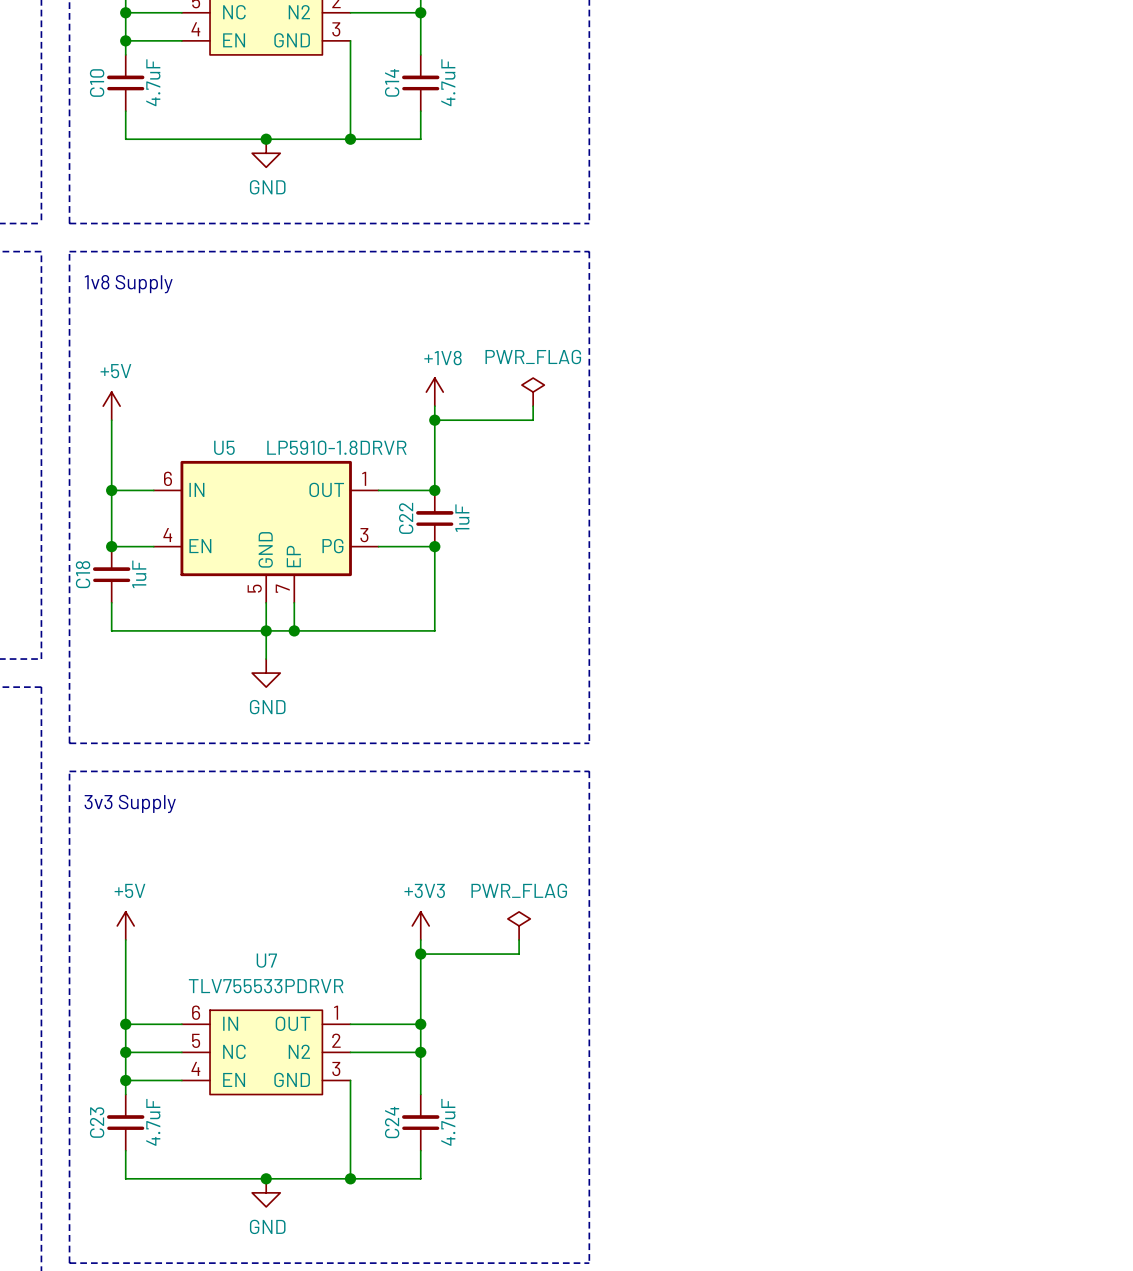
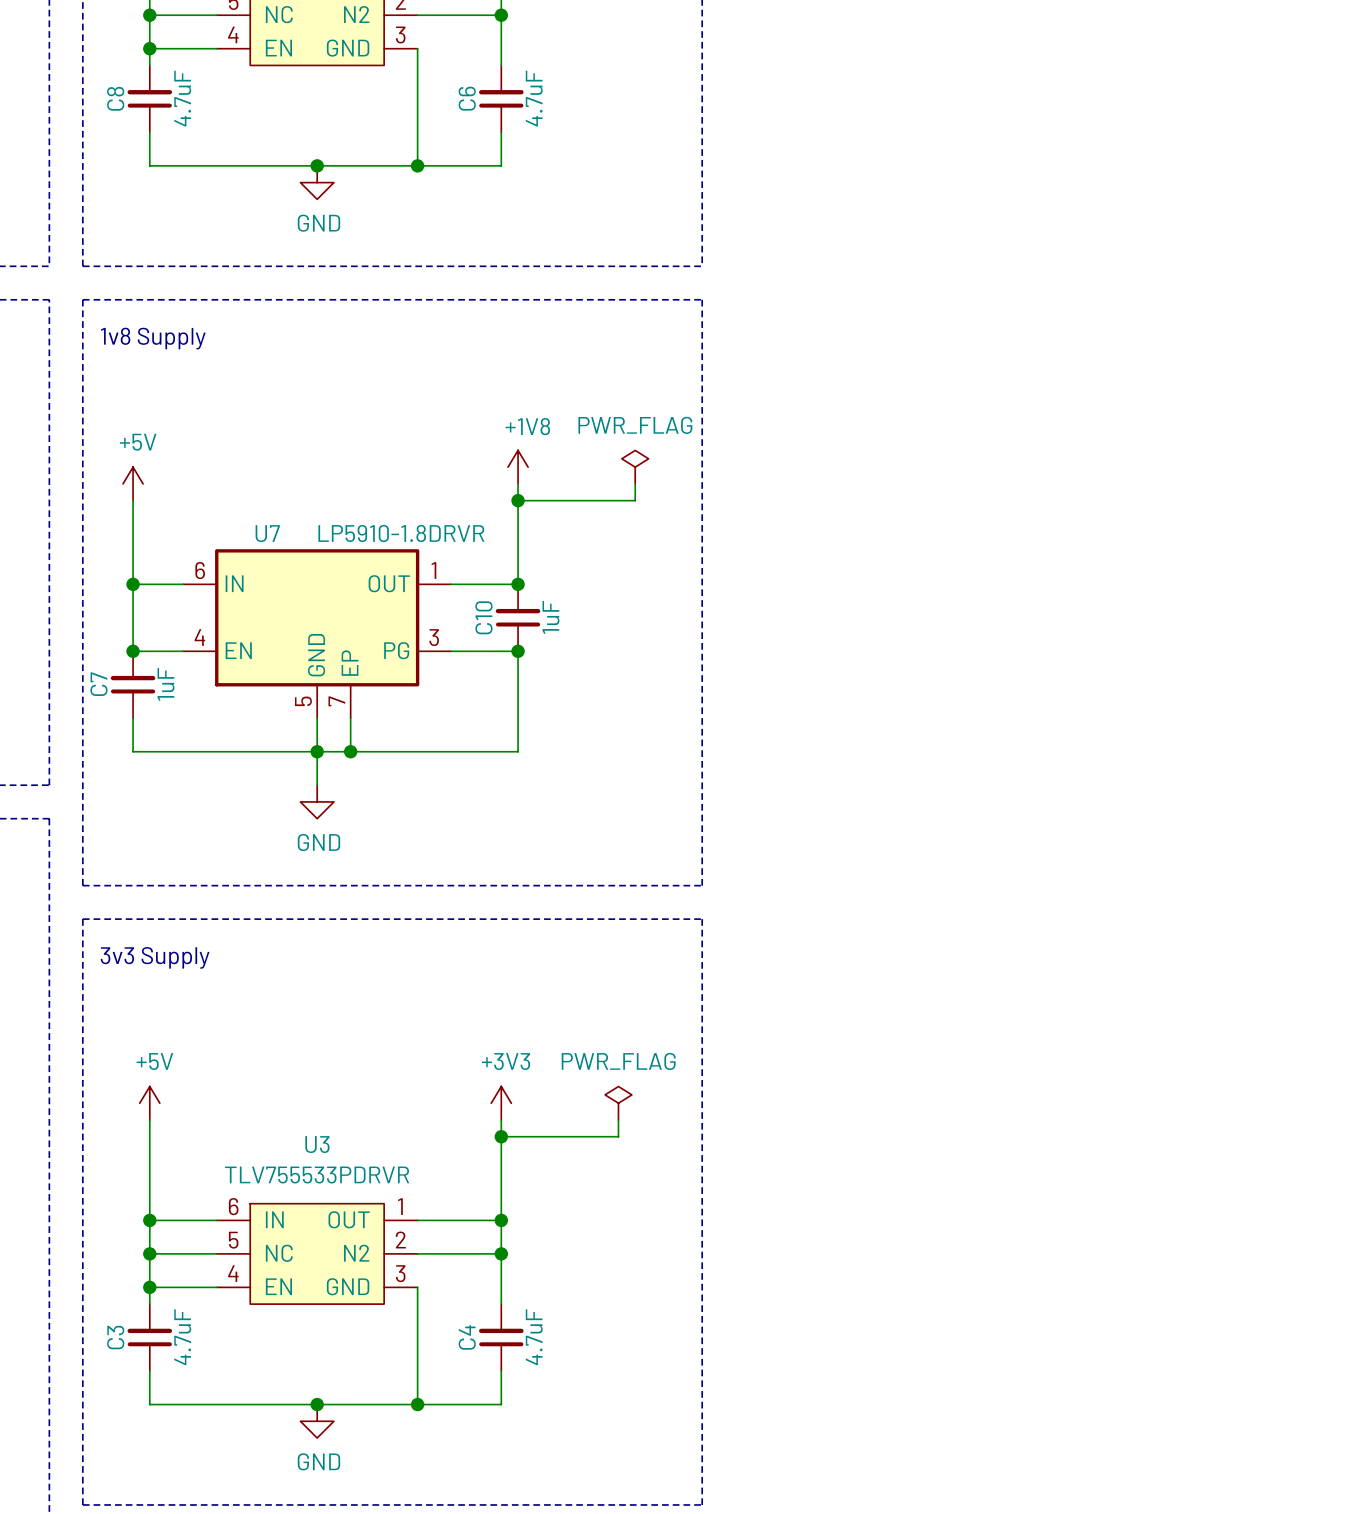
C14 name: C14 (392, 82) -> C6 (467, 98)
C10 name: C10 (97, 83) -> C8 (115, 98)
U5 name: U5 (224, 447) -> U7 (267, 533)
C22 name: C22 (406, 518) -> C10 (483, 617)
C18 name: C18 (83, 574) -> C7 (98, 684)
U7 name: U7 (266, 960) -> U3 (317, 1144)
C23 name: C23 (97, 1122) -> C3 (115, 1337)
C24 name: C24 (392, 1122) -> C4 (467, 1337)

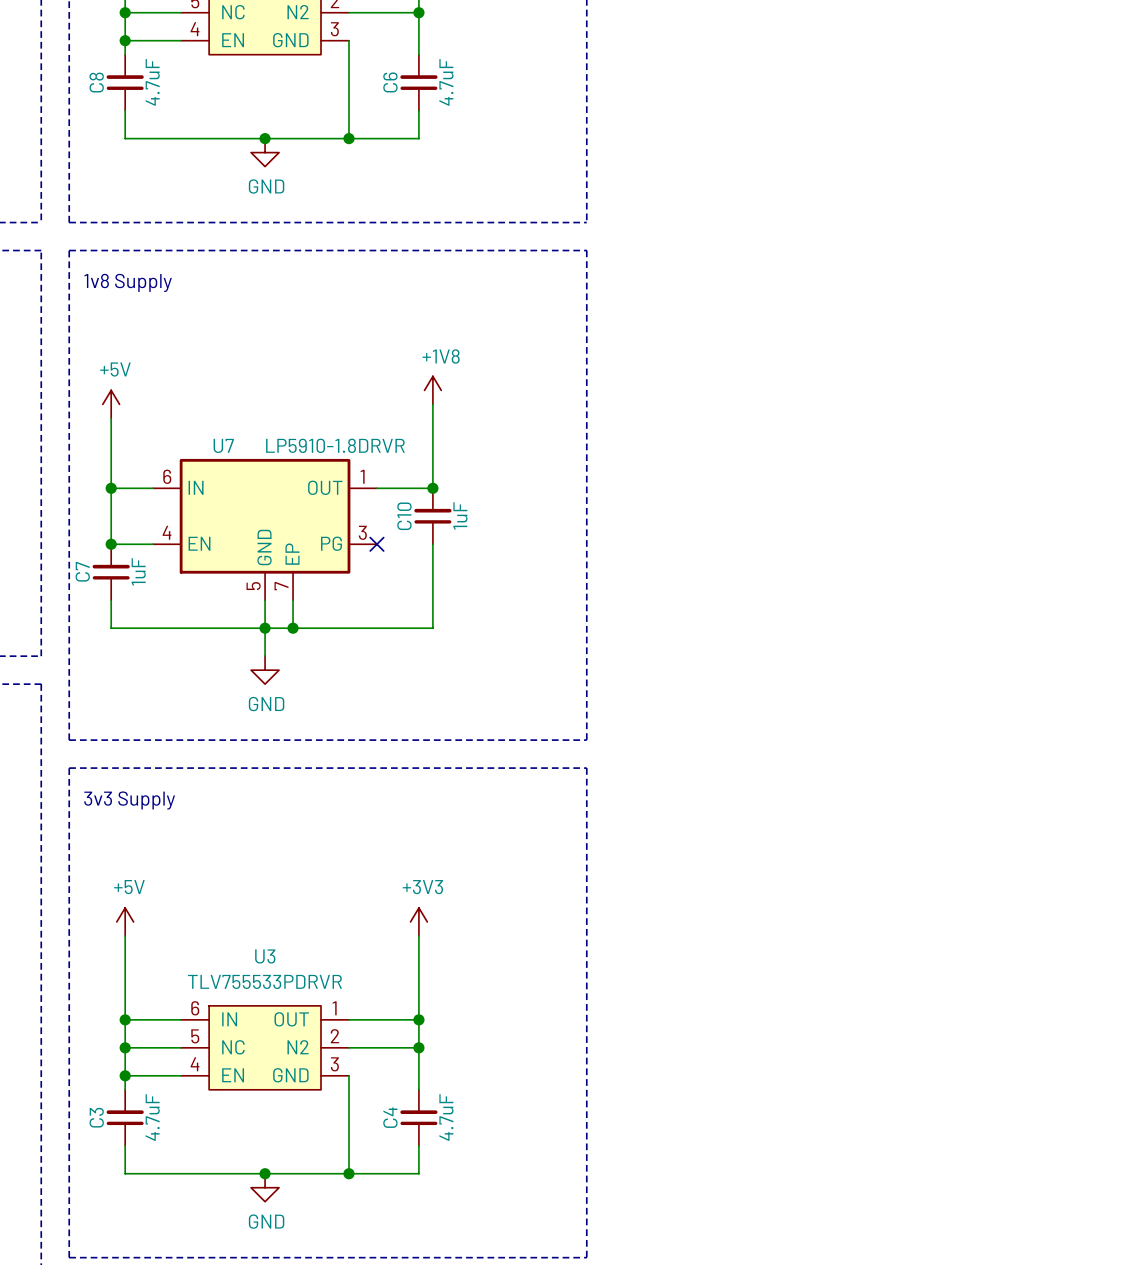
power symbol: PWR_FLAG (635, 467) -> none
wire: (635, 483) (635, 500) (518, 500) -> none
junction: (518, 500) -> none
wire: (451, 651) (518, 651) -> none
no-connect mark: none -> (376, 544)
junction: (518, 651) -> none
power symbol: PWR_FLAG (618, 1103) -> none
wire: (618, 1119) (618, 1136) (501, 1136) -> none
junction: (501, 1136) -> none

